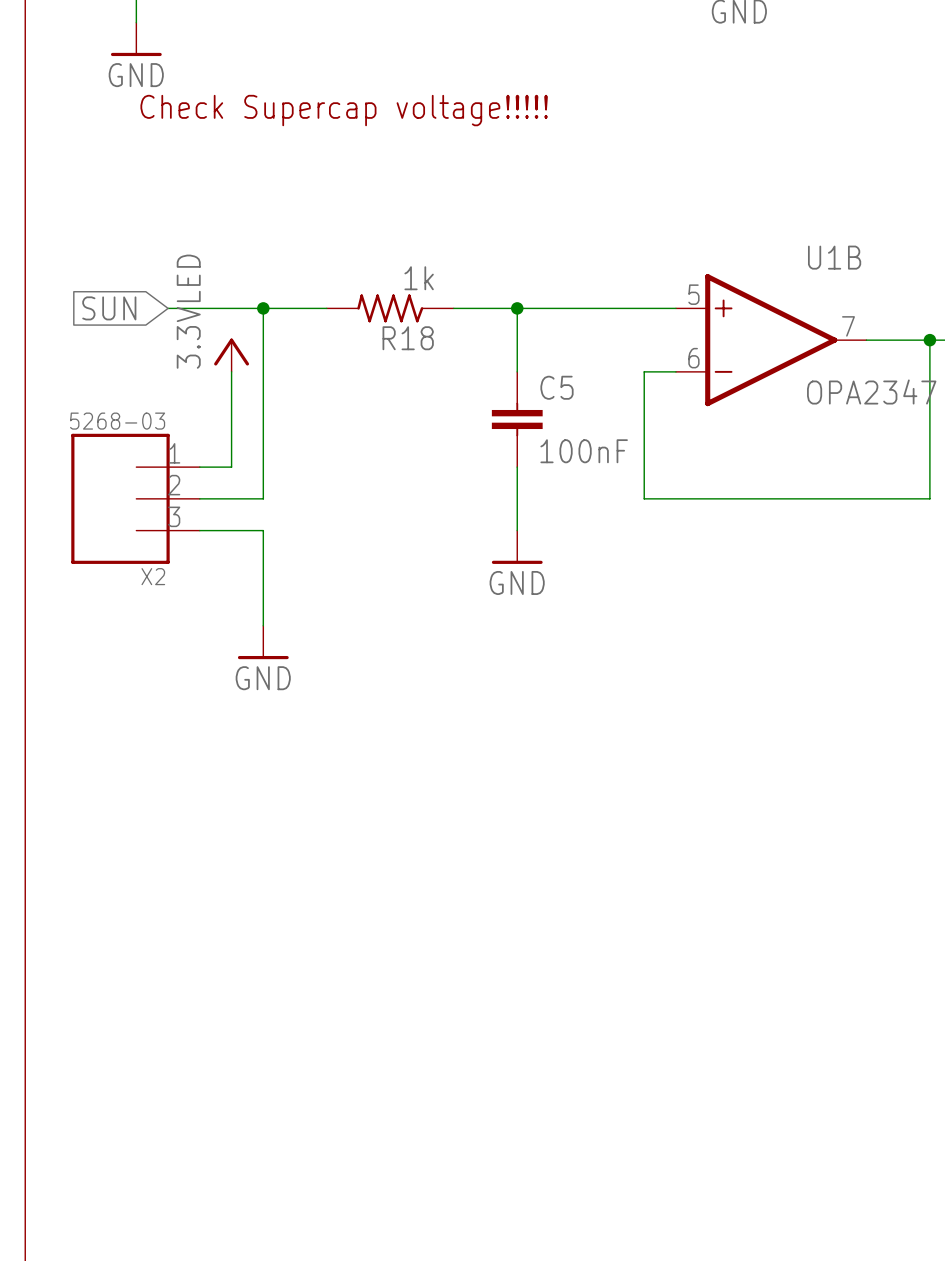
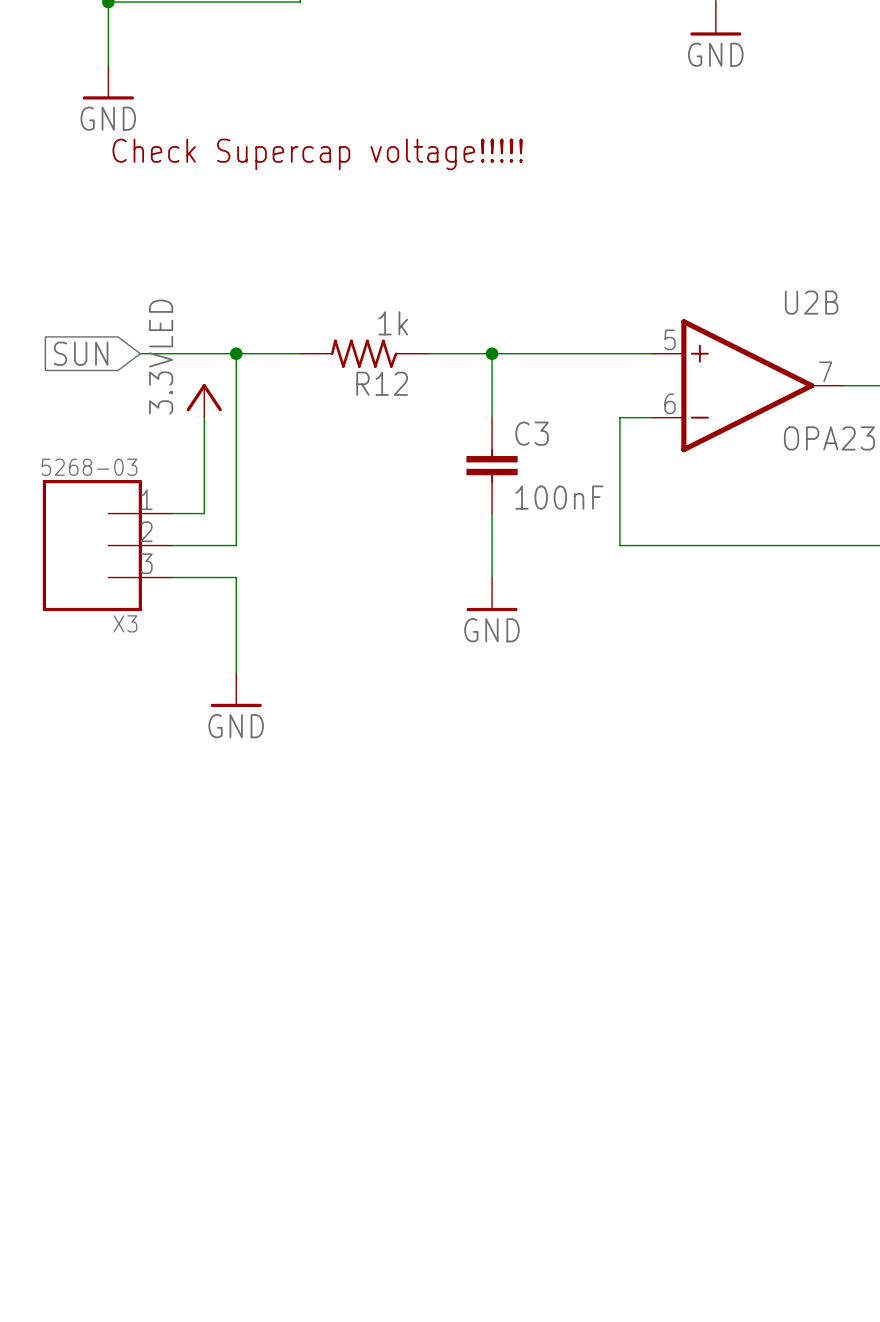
U1B name: U1B (834, 257) -> U2B (811, 302)
R18 name: R18 (408, 338) -> R12 (382, 383)
C5 name: C5 (557, 387) -> C3 (532, 433)
X2 name: X2 (153, 576) -> X3 (125, 623)

